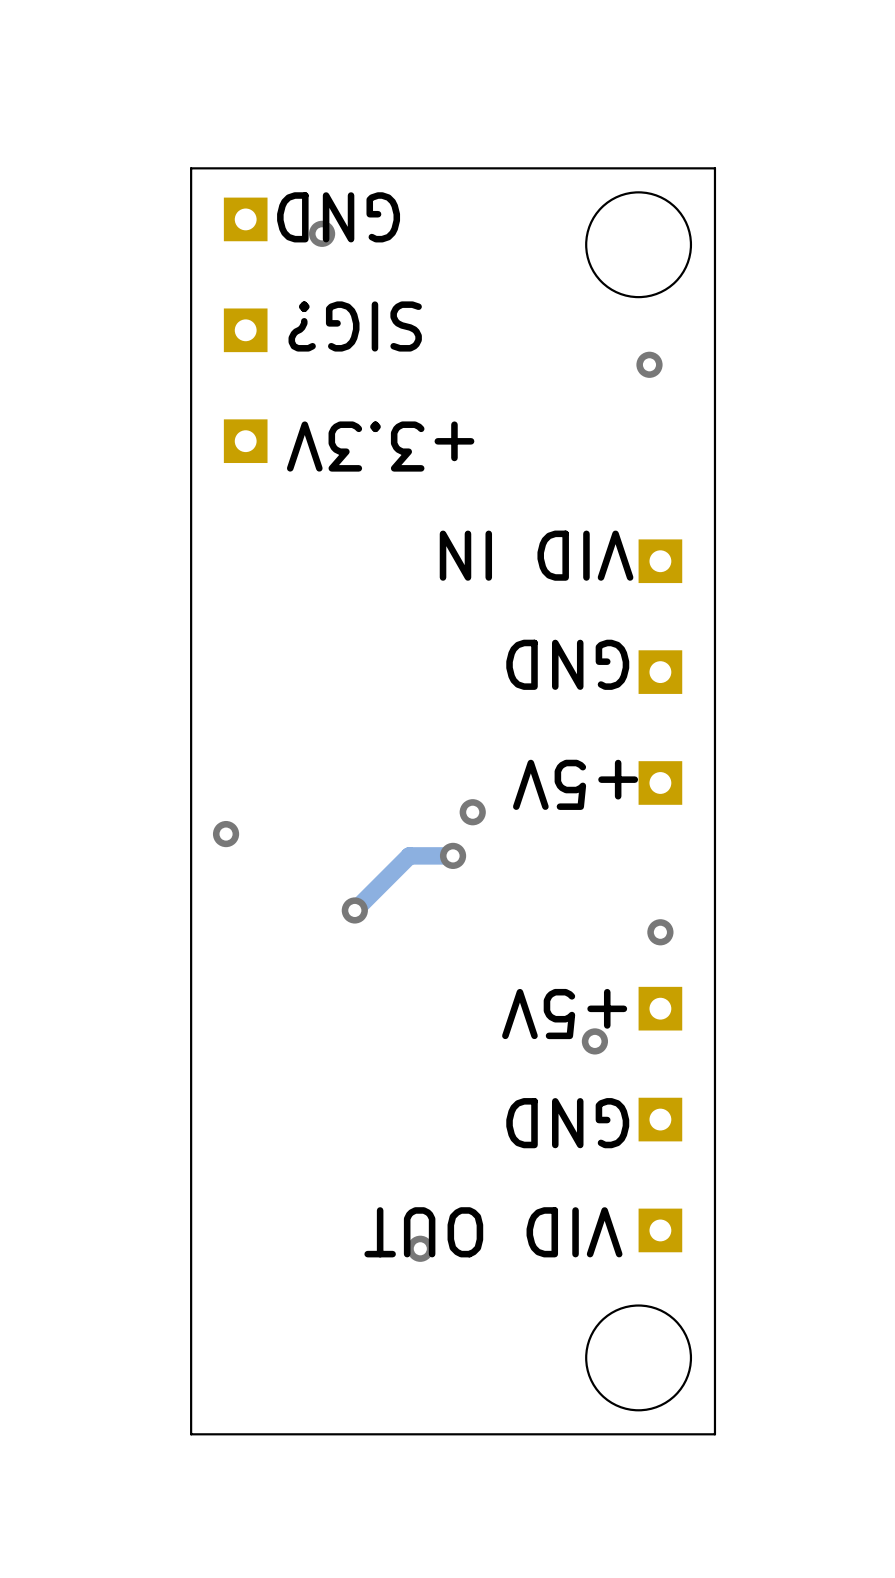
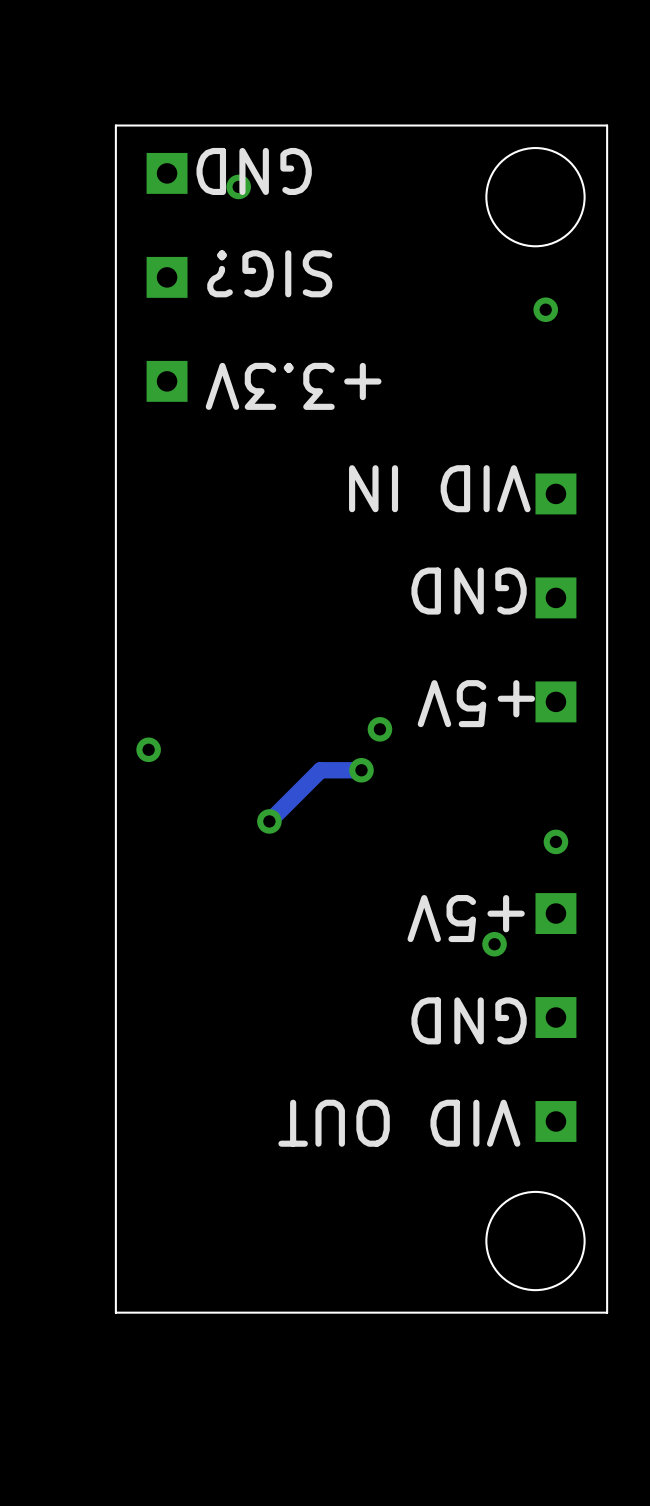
via: (420, 1248) -> none

